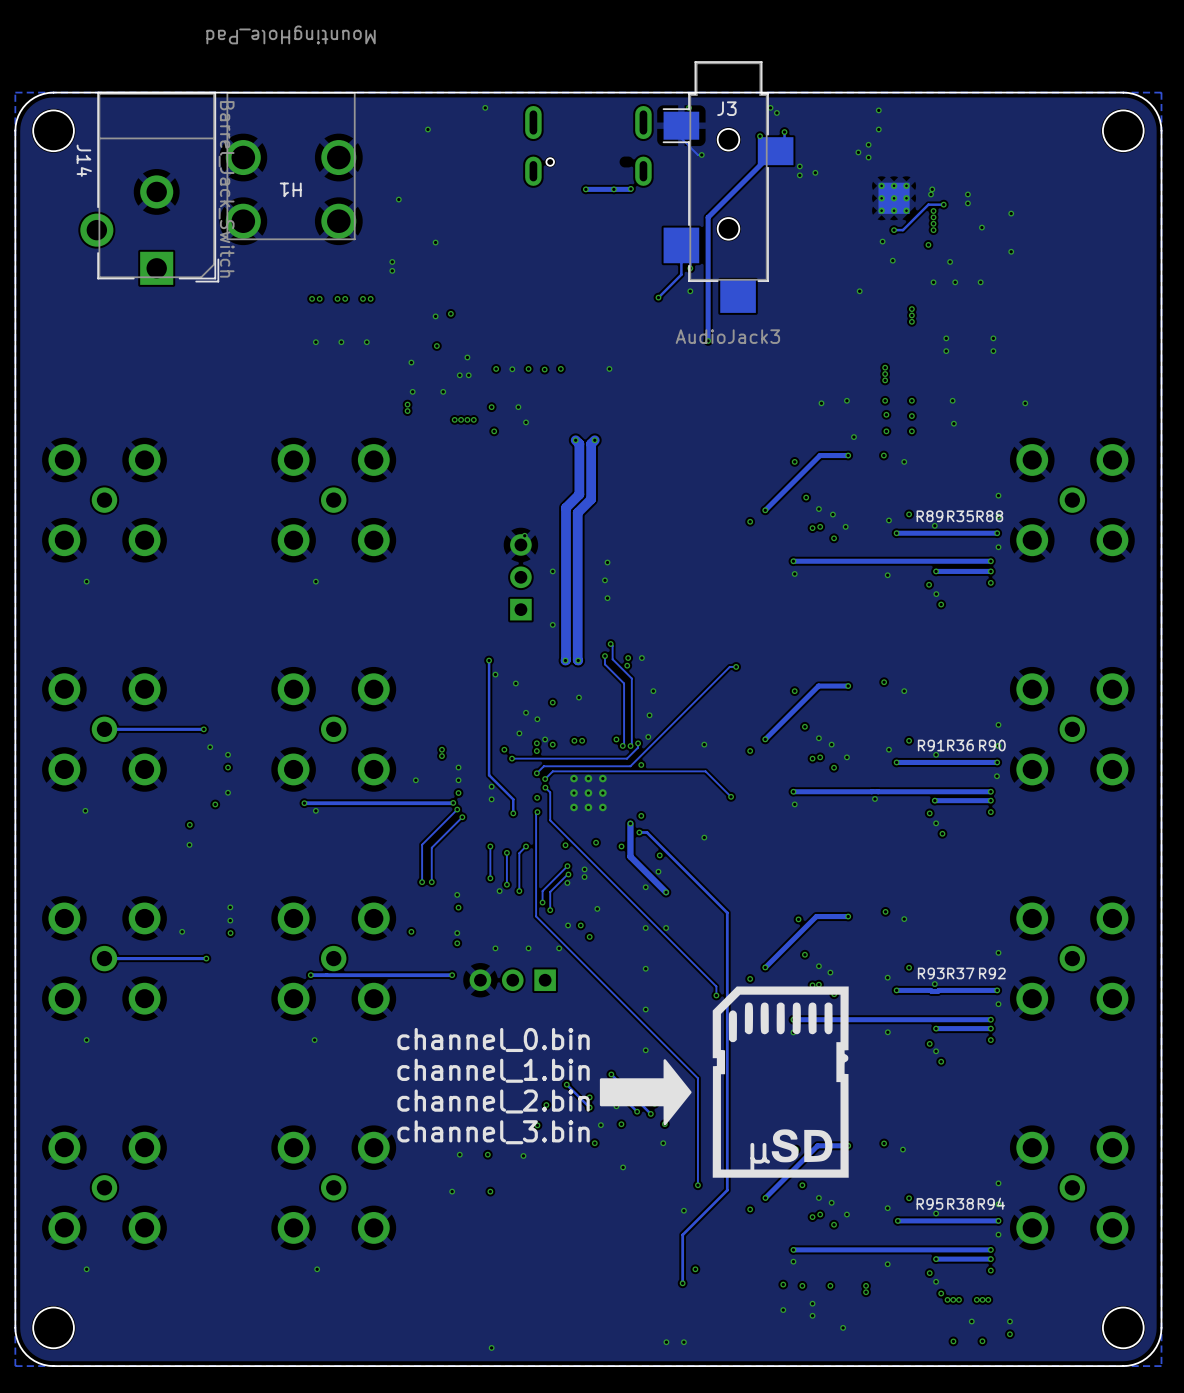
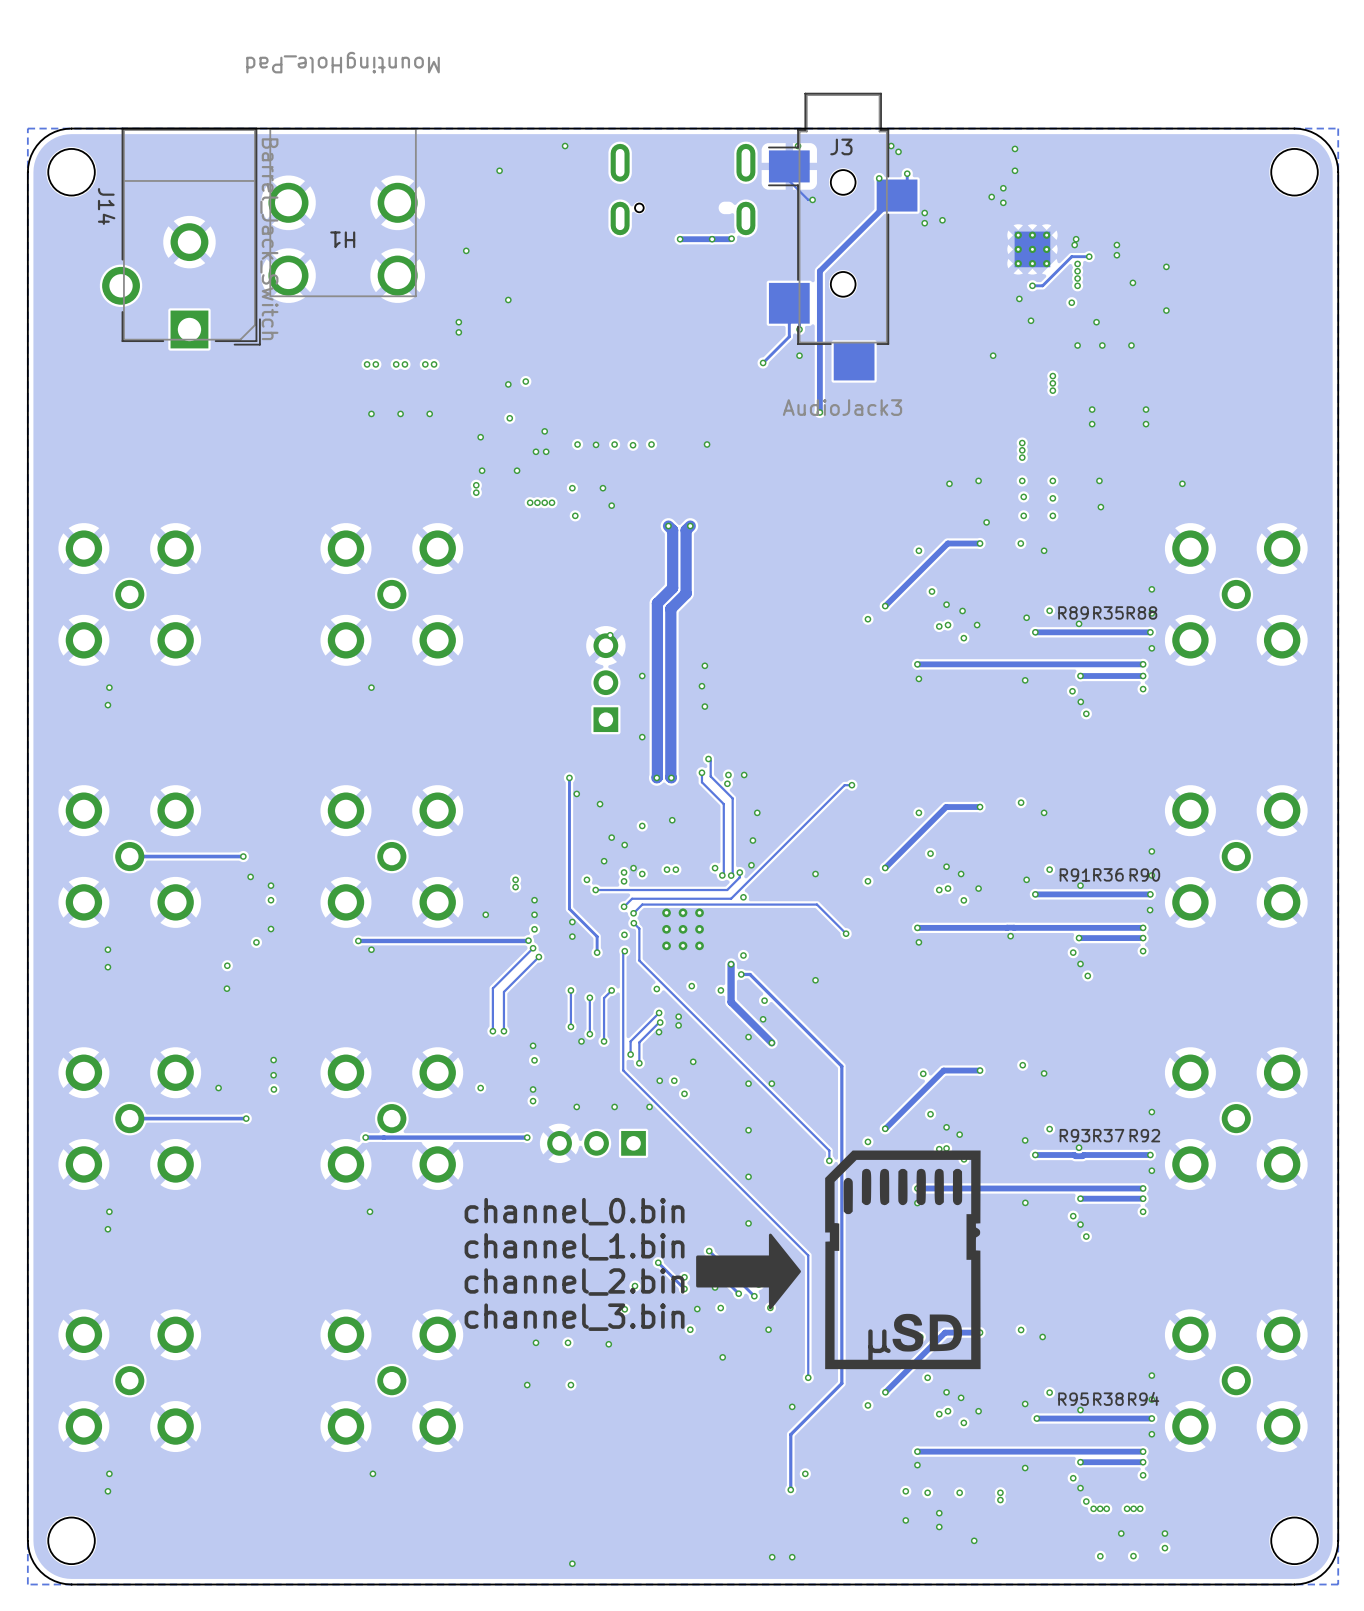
via: none -> (107, 705)
via: none -> (107, 967)
via: none -> (107, 1229)
via: none -> (107, 1491)

